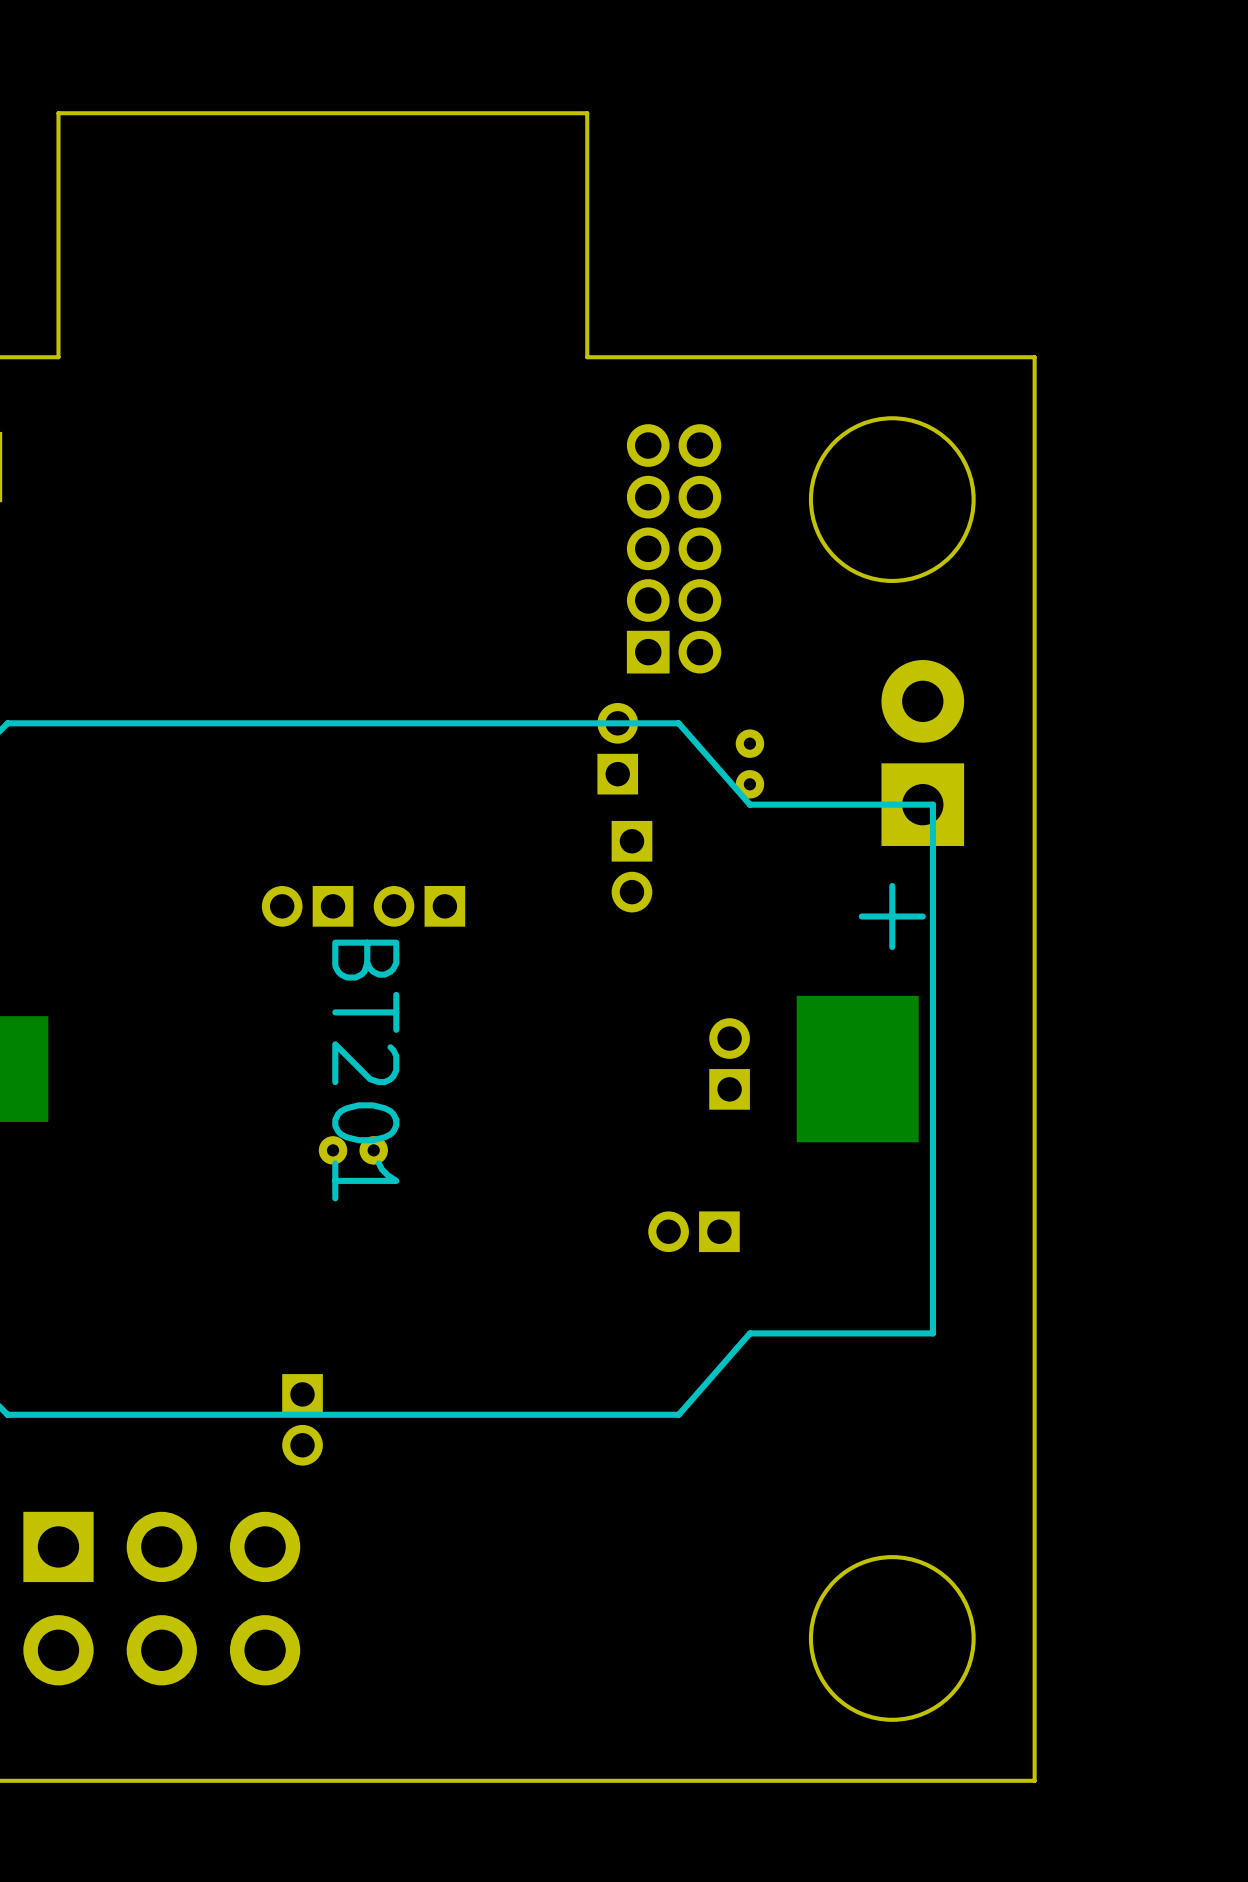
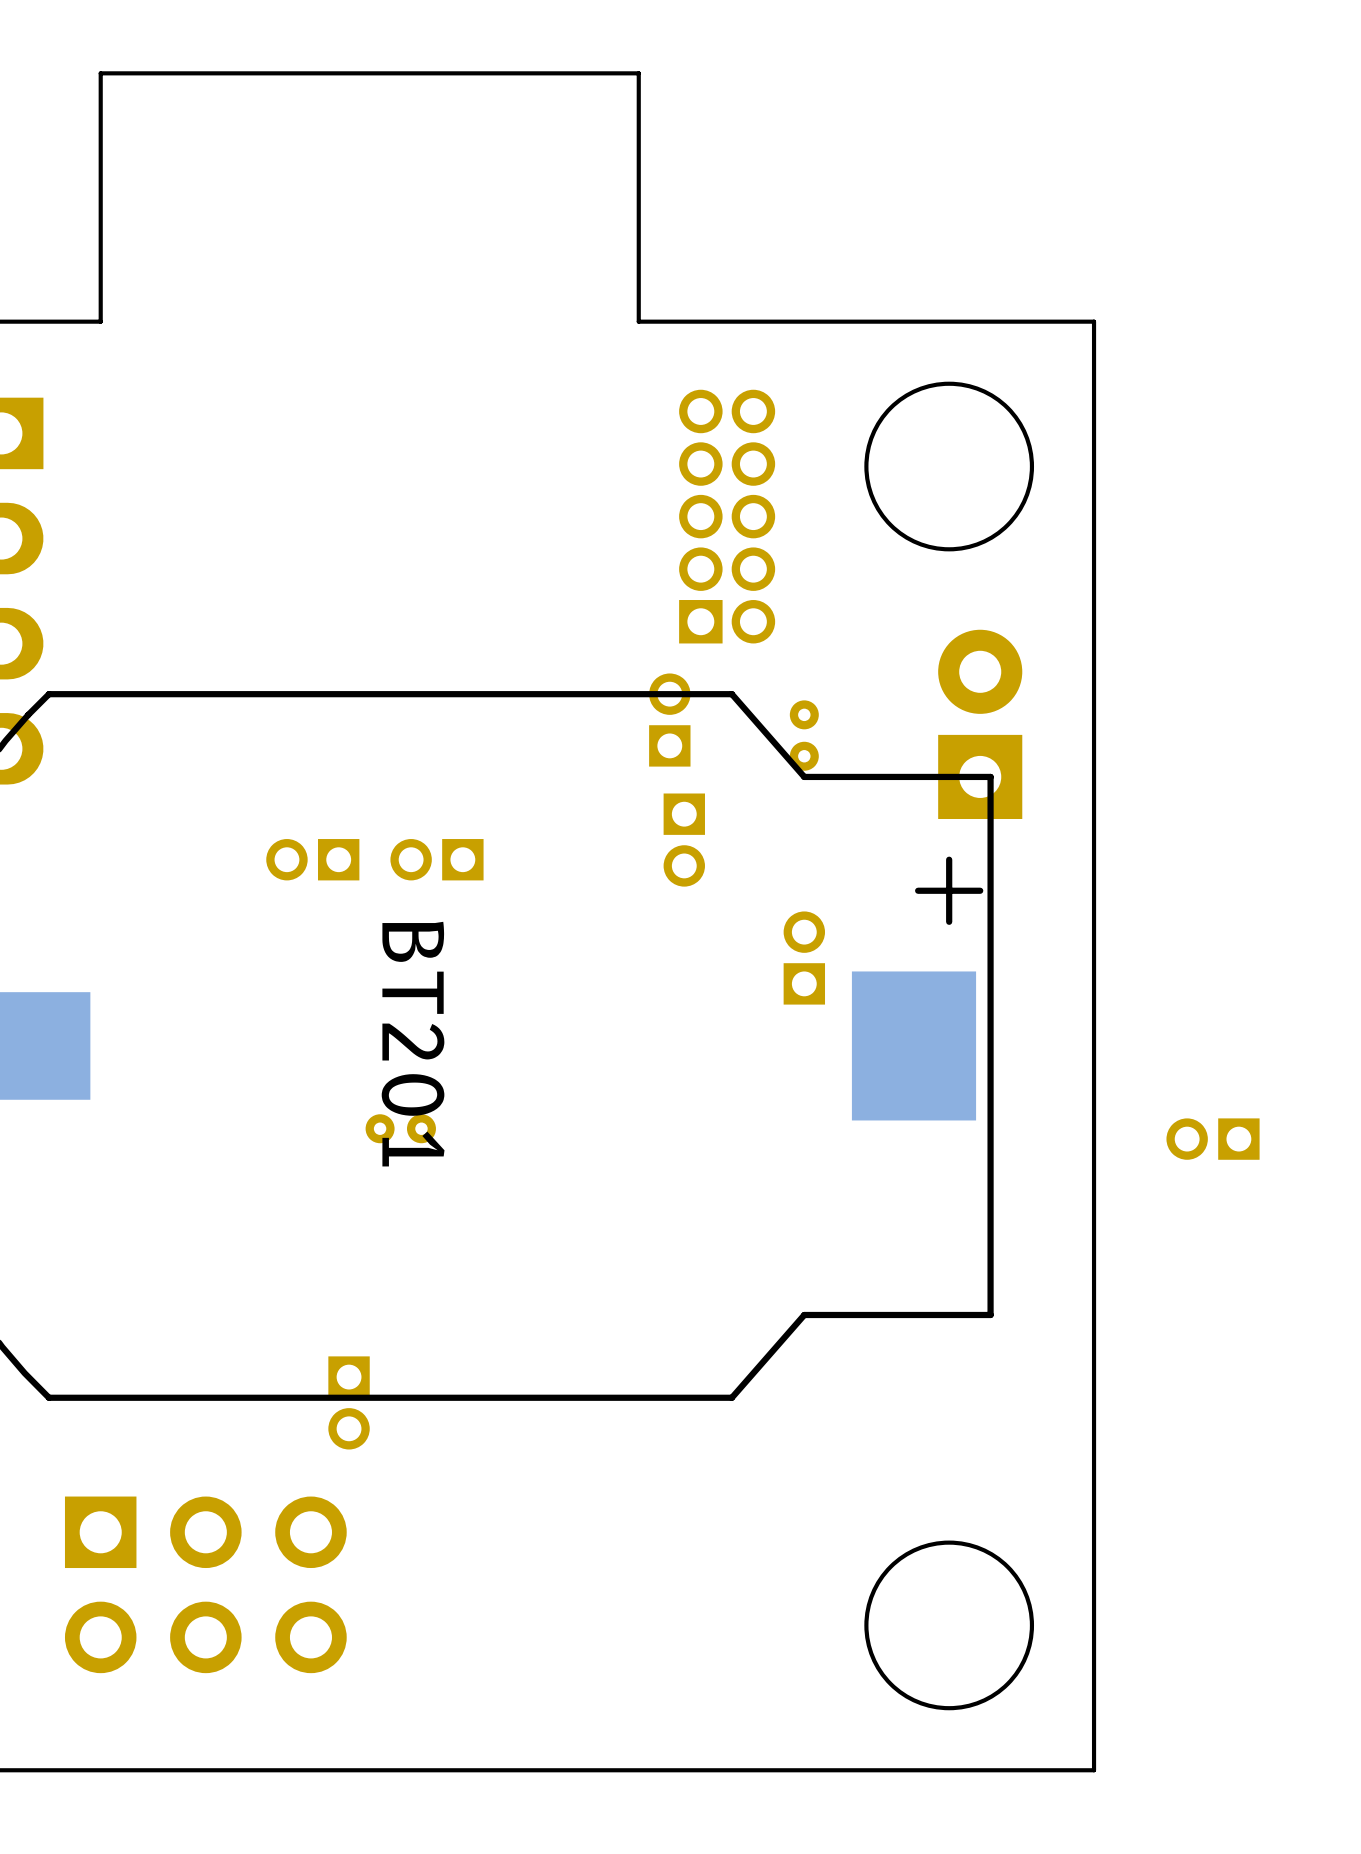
part position: (307, 906) -> (312, 859)
part position: (419, 906) -> (436, 859)
part position: (729, 1063) -> (804, 958)
part: none -> (1213, 1139)
part: (694, 1231) -> none

